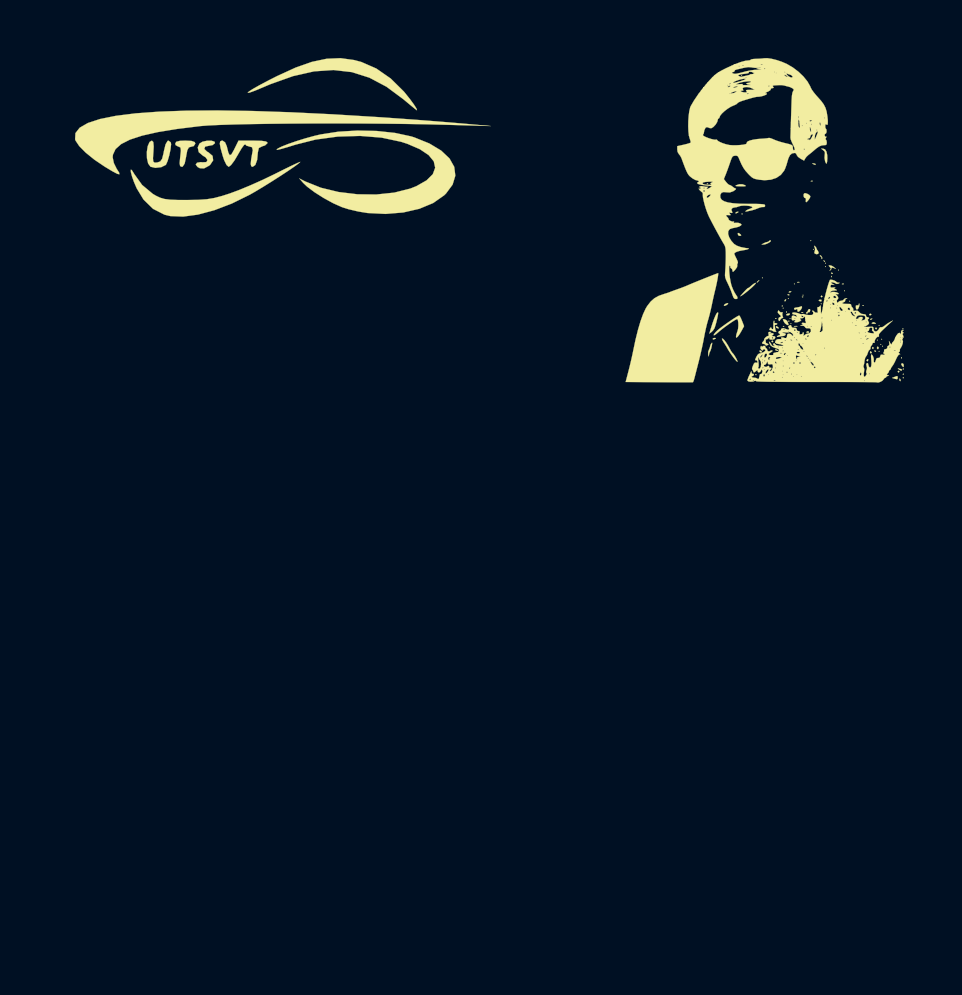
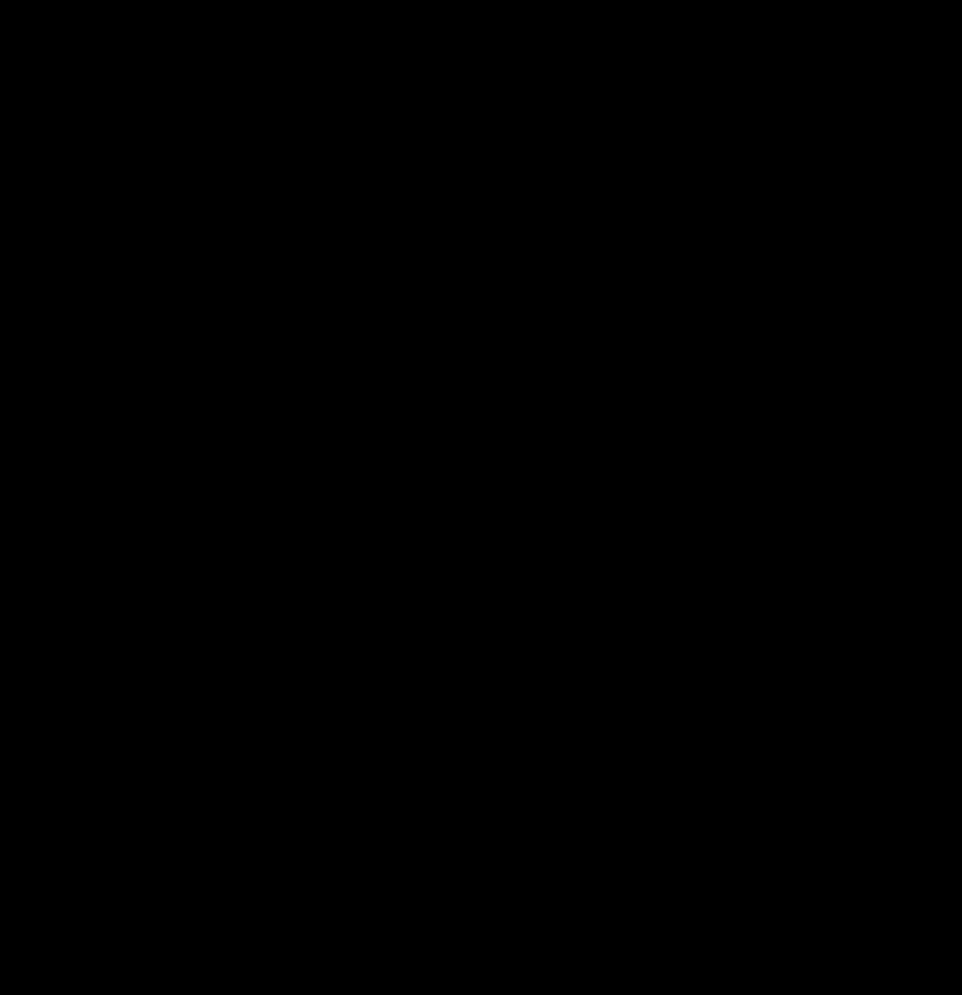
drawing: [74, 58, 491, 217] -> none
drawing: [625, 58, 904, 383] -> none

